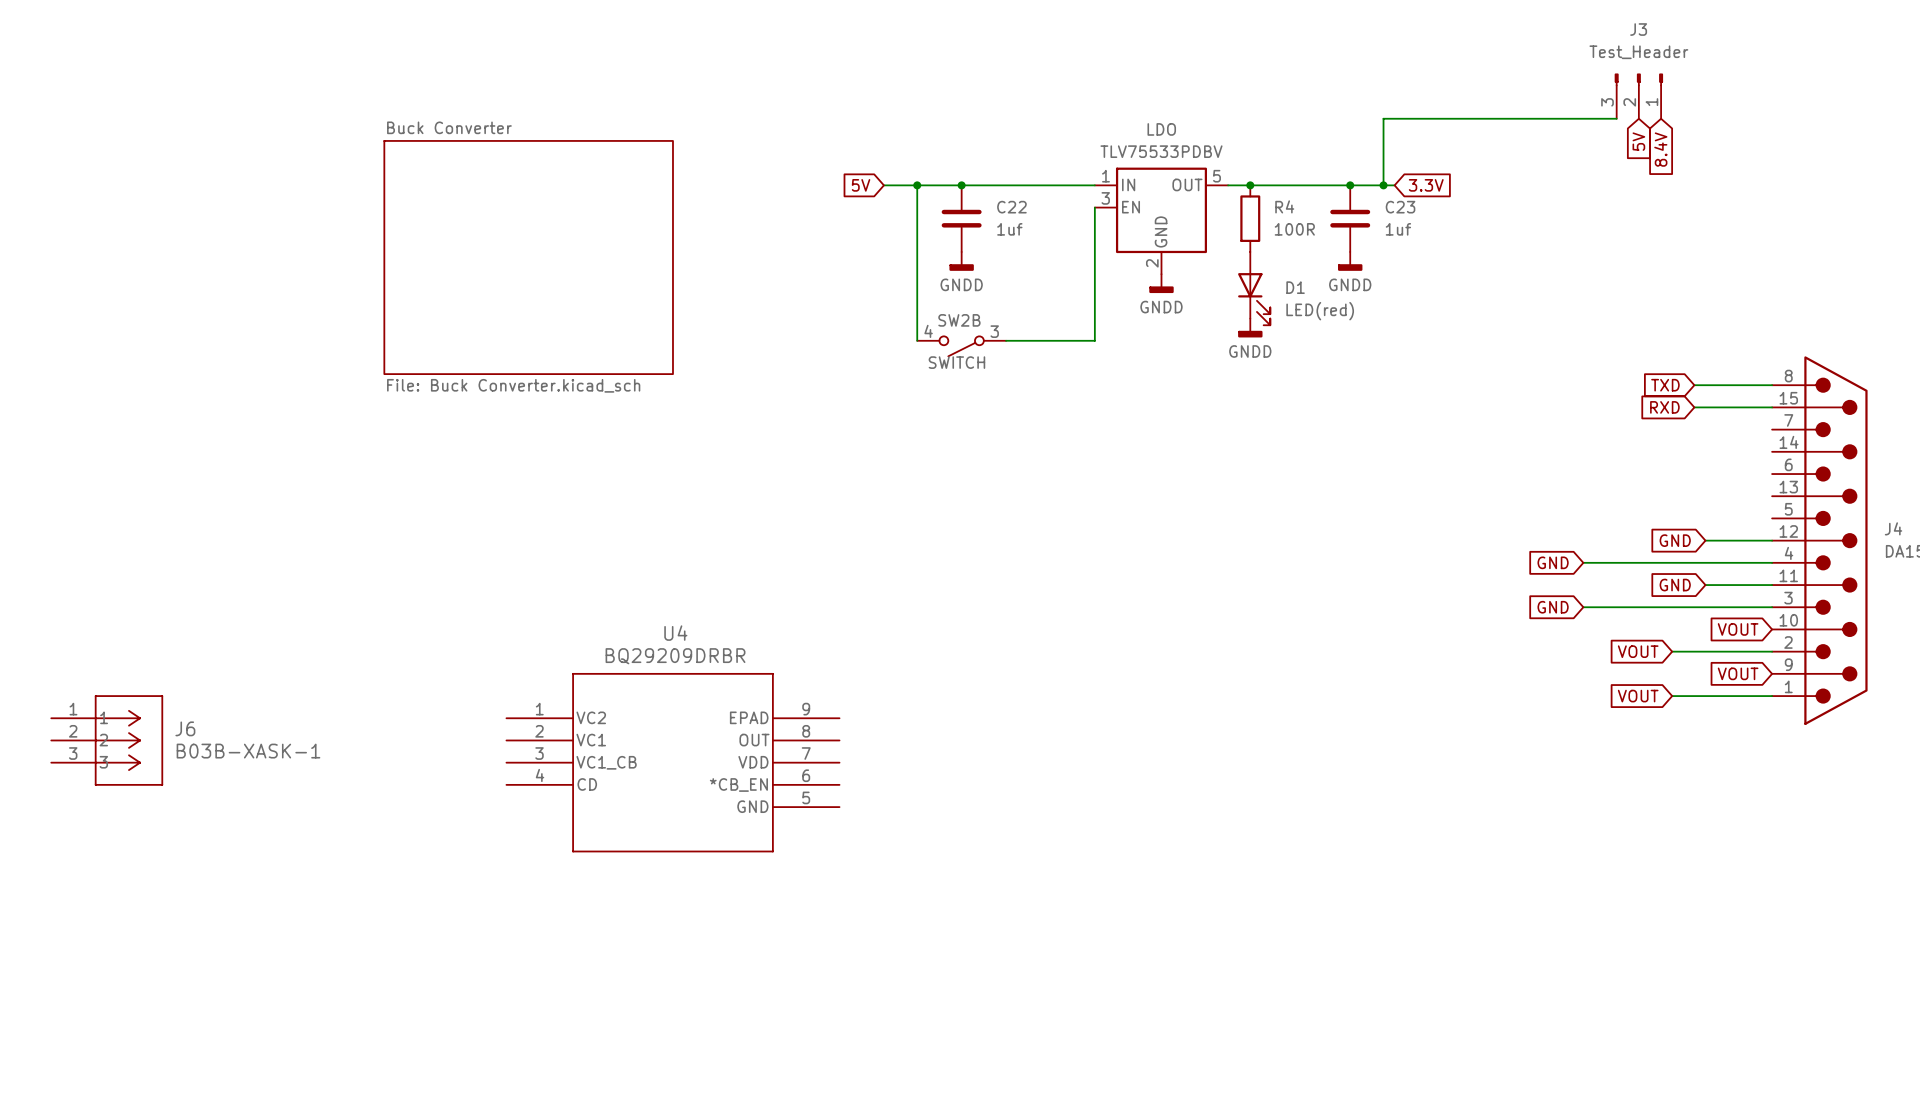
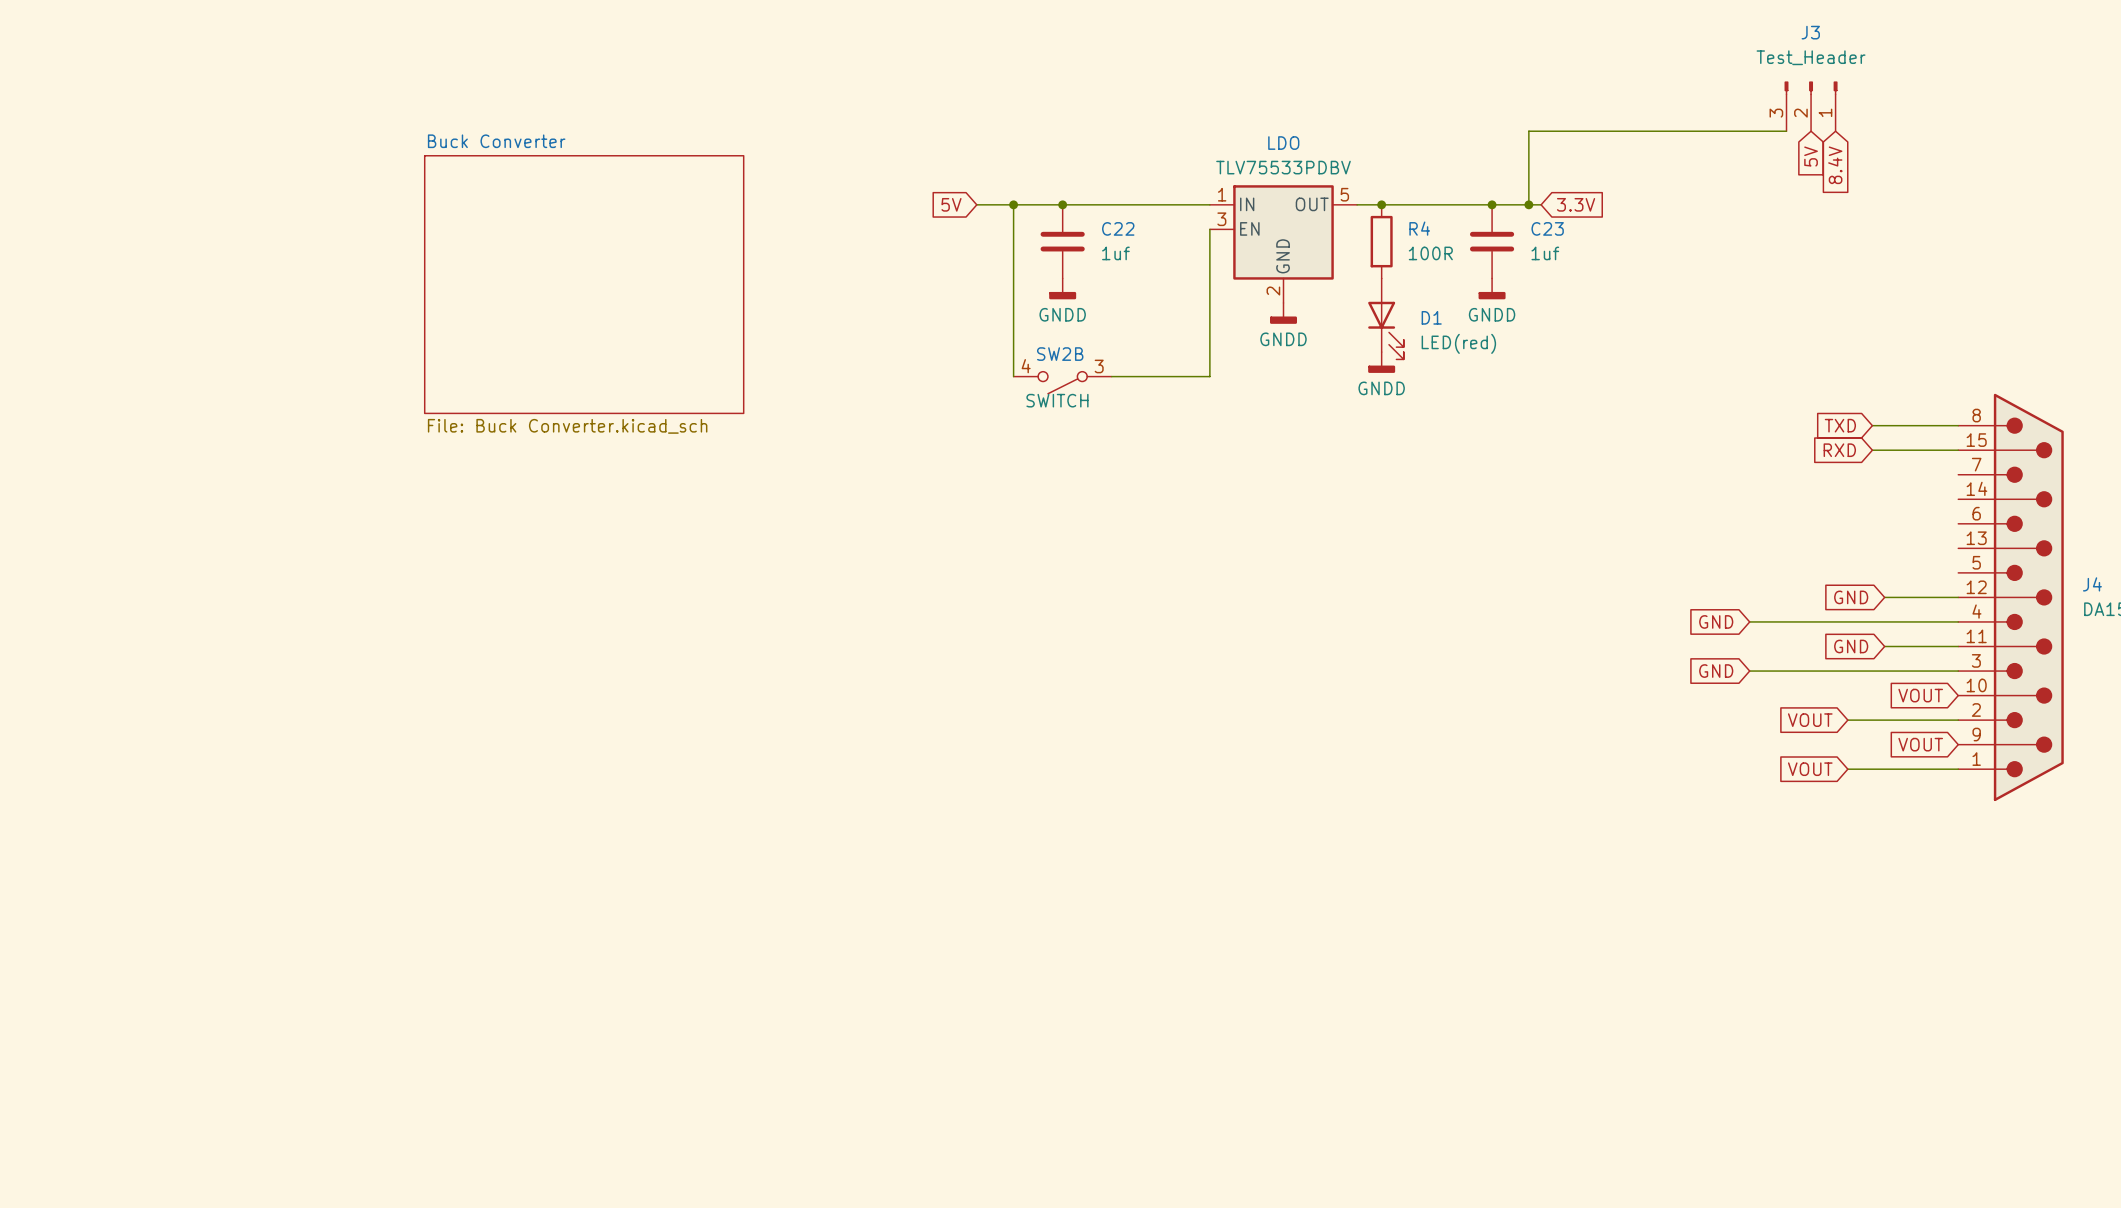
J6: B03B-XASK-1 (107, 740) -> none
U4: BQ29209DRBR (672, 762) -> none

